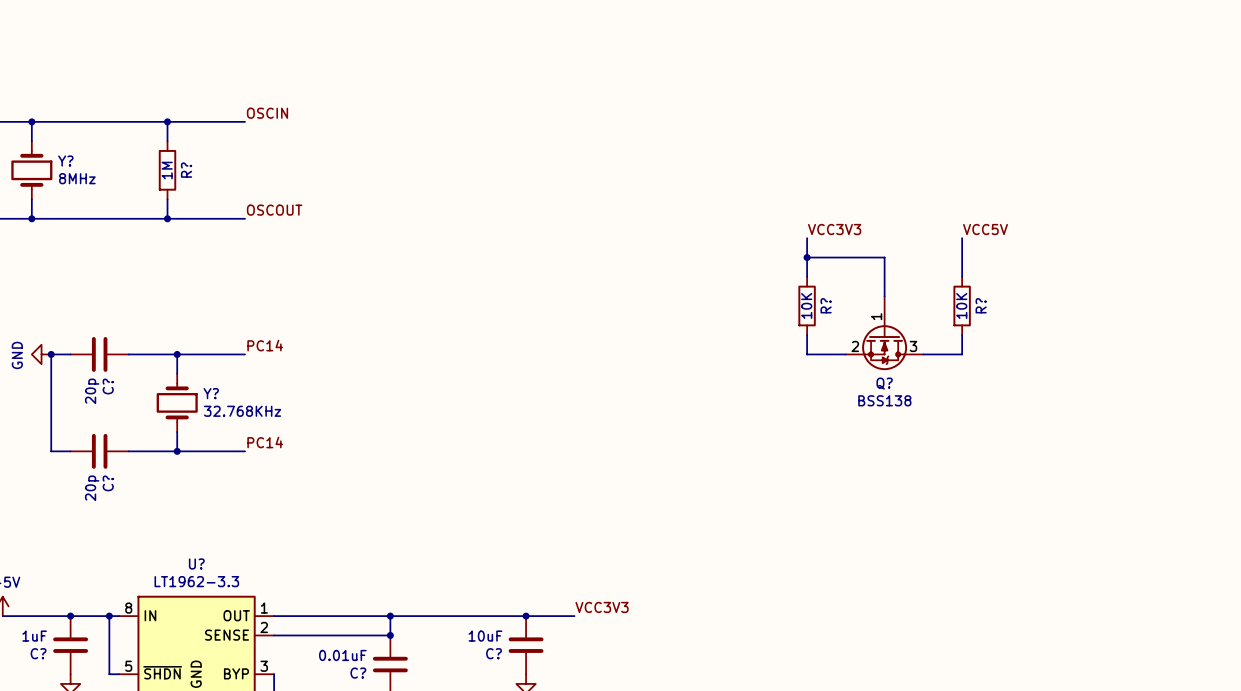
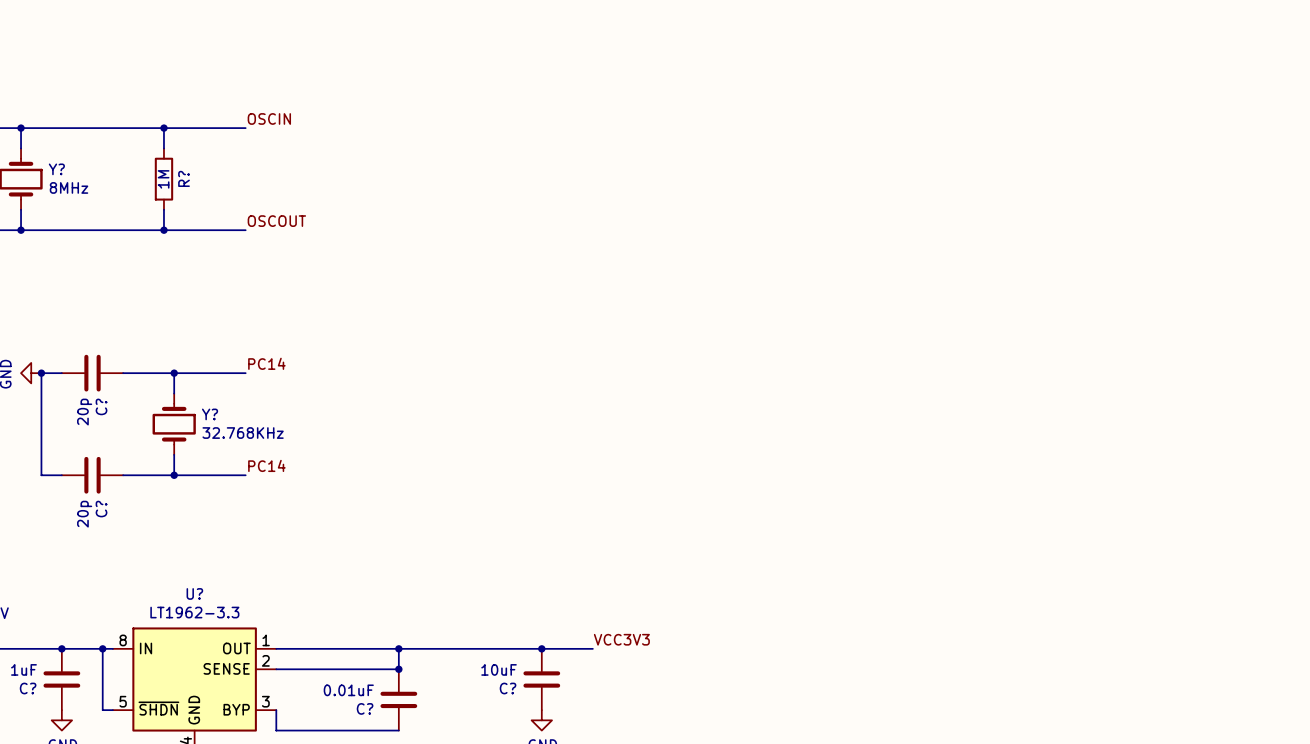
label: VCC3V3 (834, 229) -> none
label: VCC5V (985, 229) -> none
wire: (807, 238) (807, 276) -> none
wire: (962, 238) (962, 276) -> none
wire: (807, 257) (884, 257) (884, 296) -> none
junction: (807, 257) -> none
R?: 10K (807, 306) -> none
R?: 10K (962, 306) -> none
Q?: BSS138 (884, 333) -> none
wire: (807, 335) (807, 354) (845, 354) -> none
wire: (962, 335) (962, 354) (923, 354) -> none

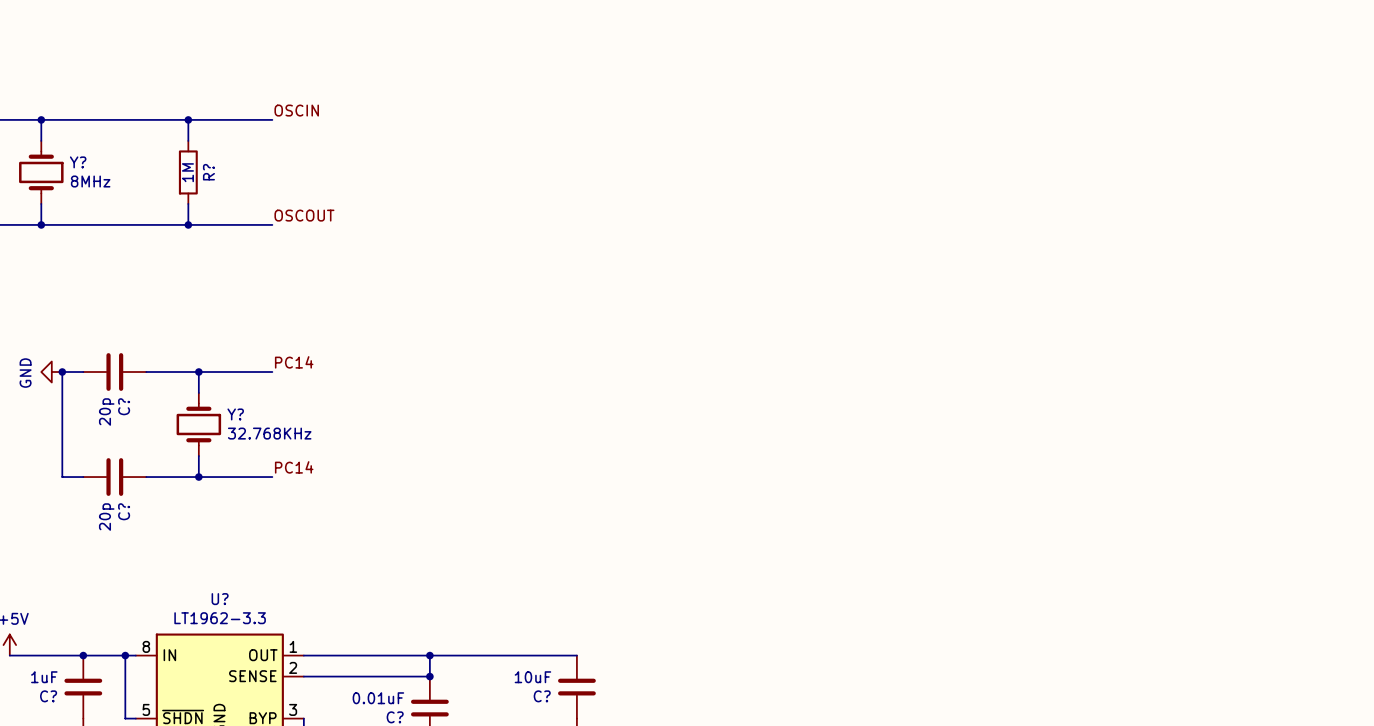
label: VCC3V3 (621, 639) -> none
wire: (541, 648) (592, 648) -> none
junction: (541, 648) -> none

